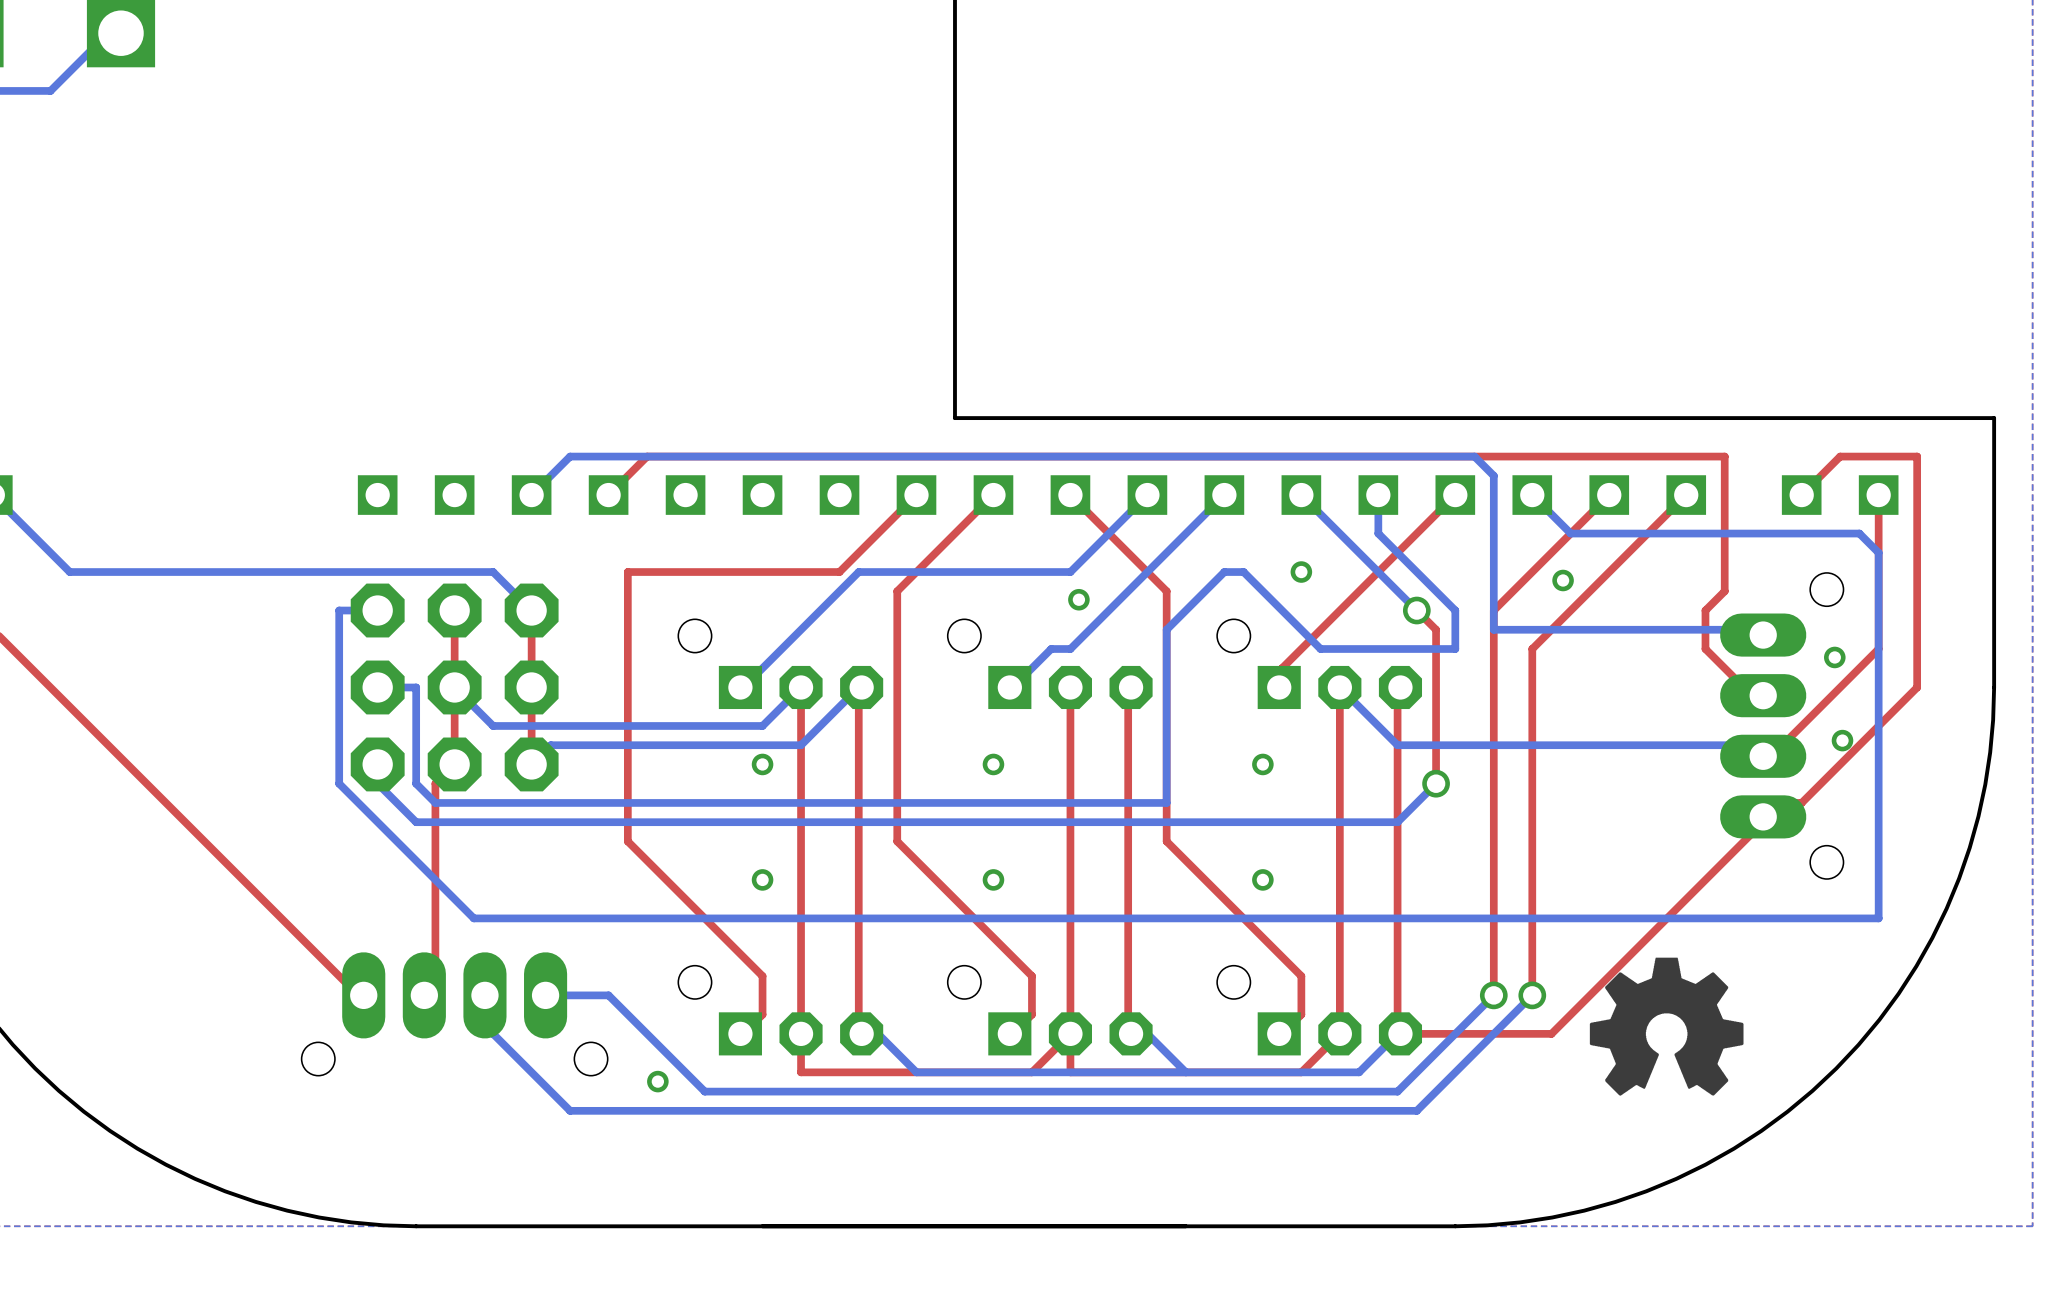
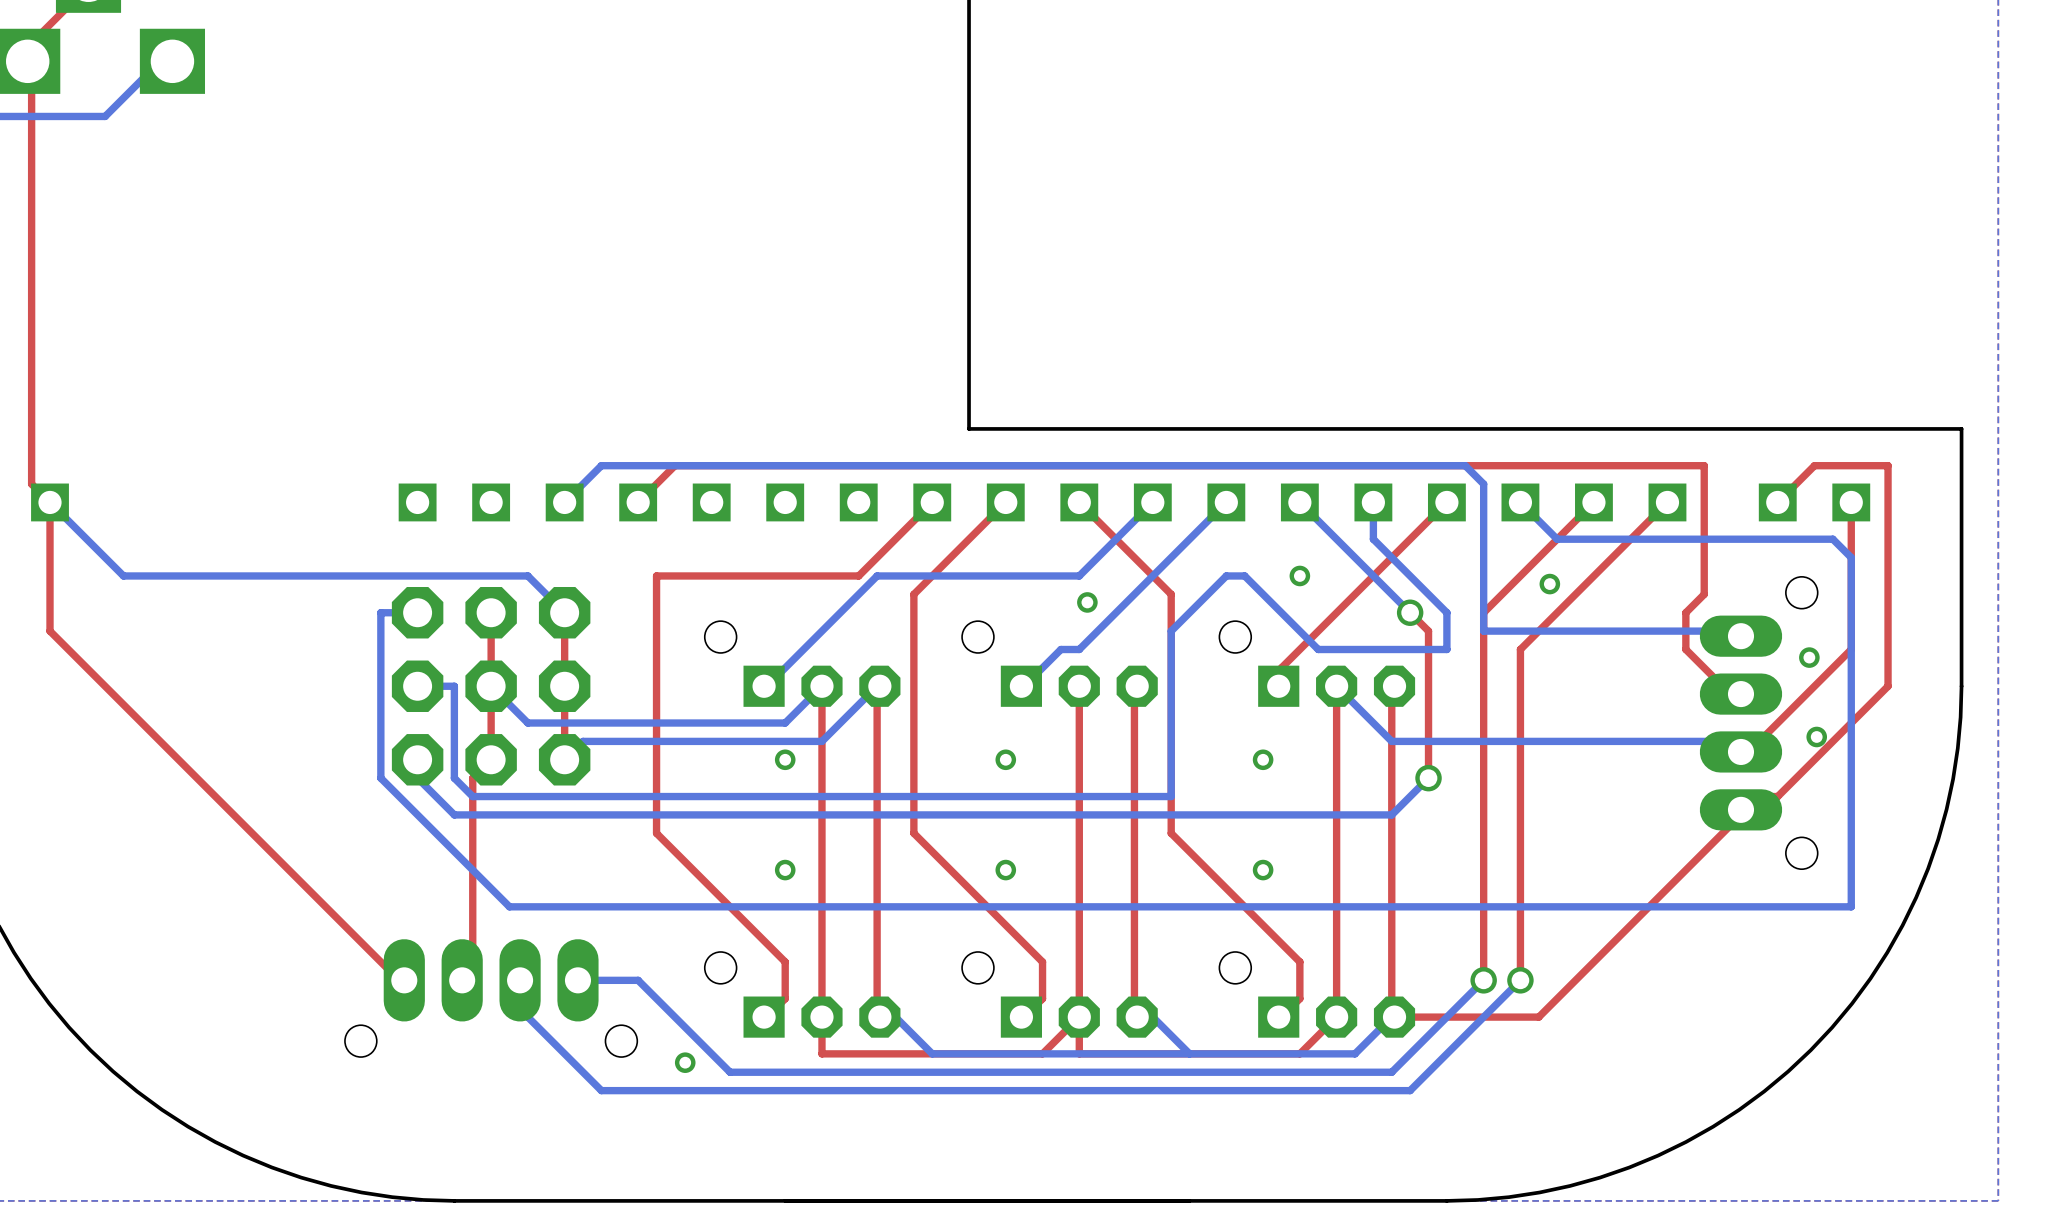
drawing: [1589, 957, 1744, 1096] -> none

